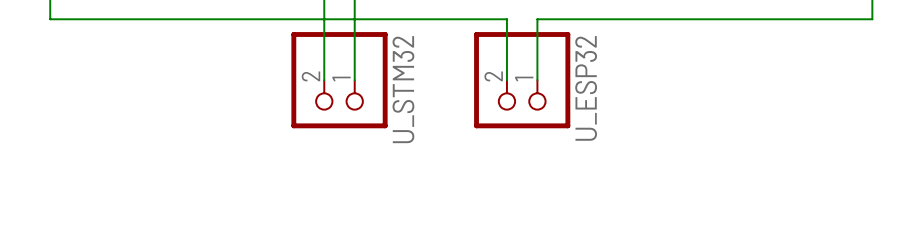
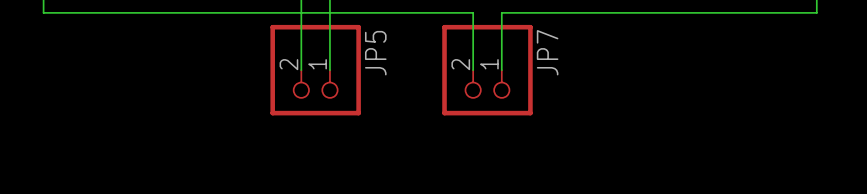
U_ESP32 name: U_ESP32 (586, 88) -> JP7 (547, 52)
U_STM32 name: U_STM32 (403, 89) -> JP5 (375, 53)

